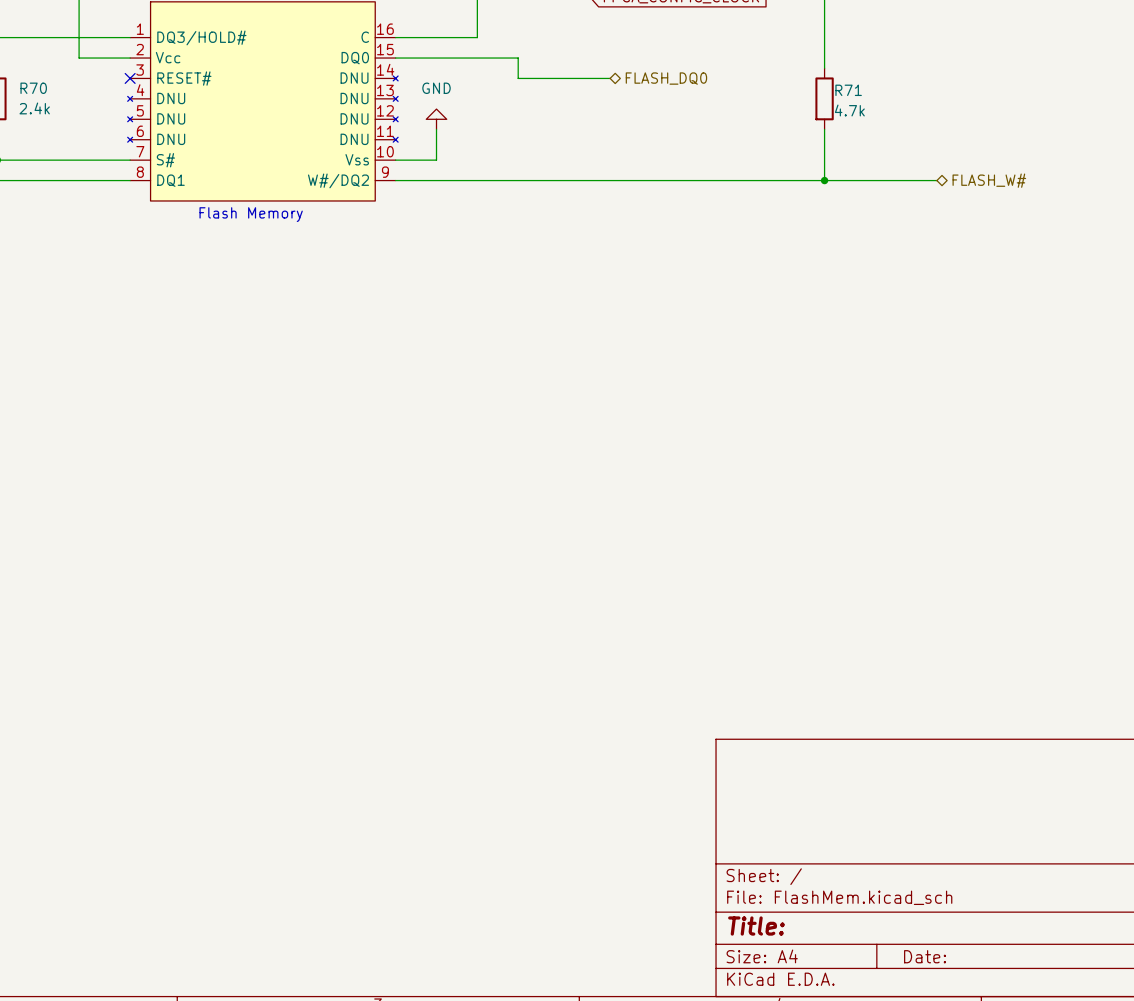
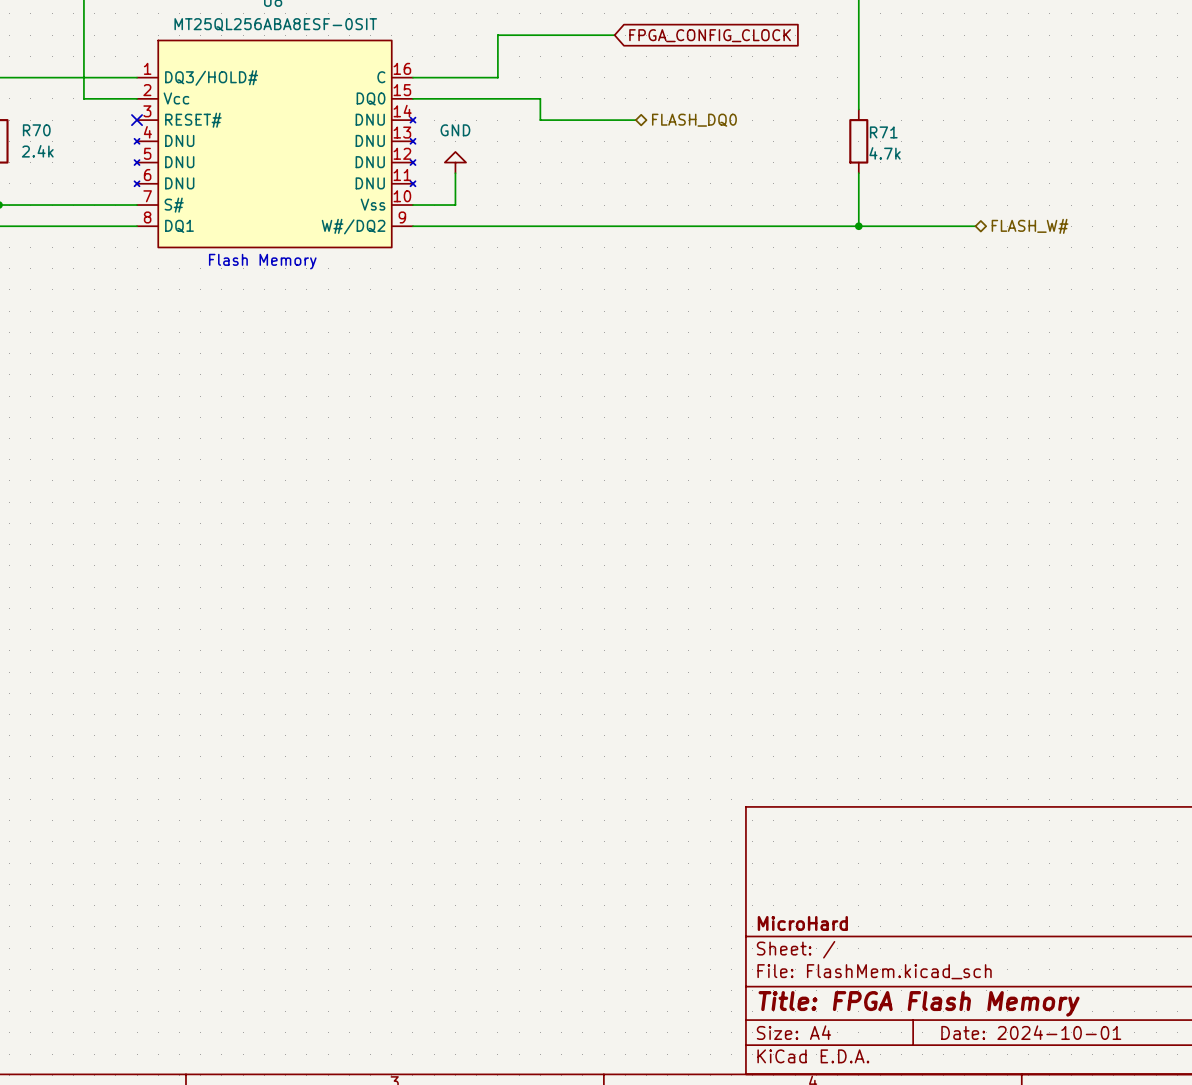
title block: none -> MicroHard (802, 923)
title block: Title: (756, 926) -> Title: FPGA Flash Memory (919, 1003)
title block: Date: (925, 956) -> Date: 2024-10-01 (1031, 1032)

